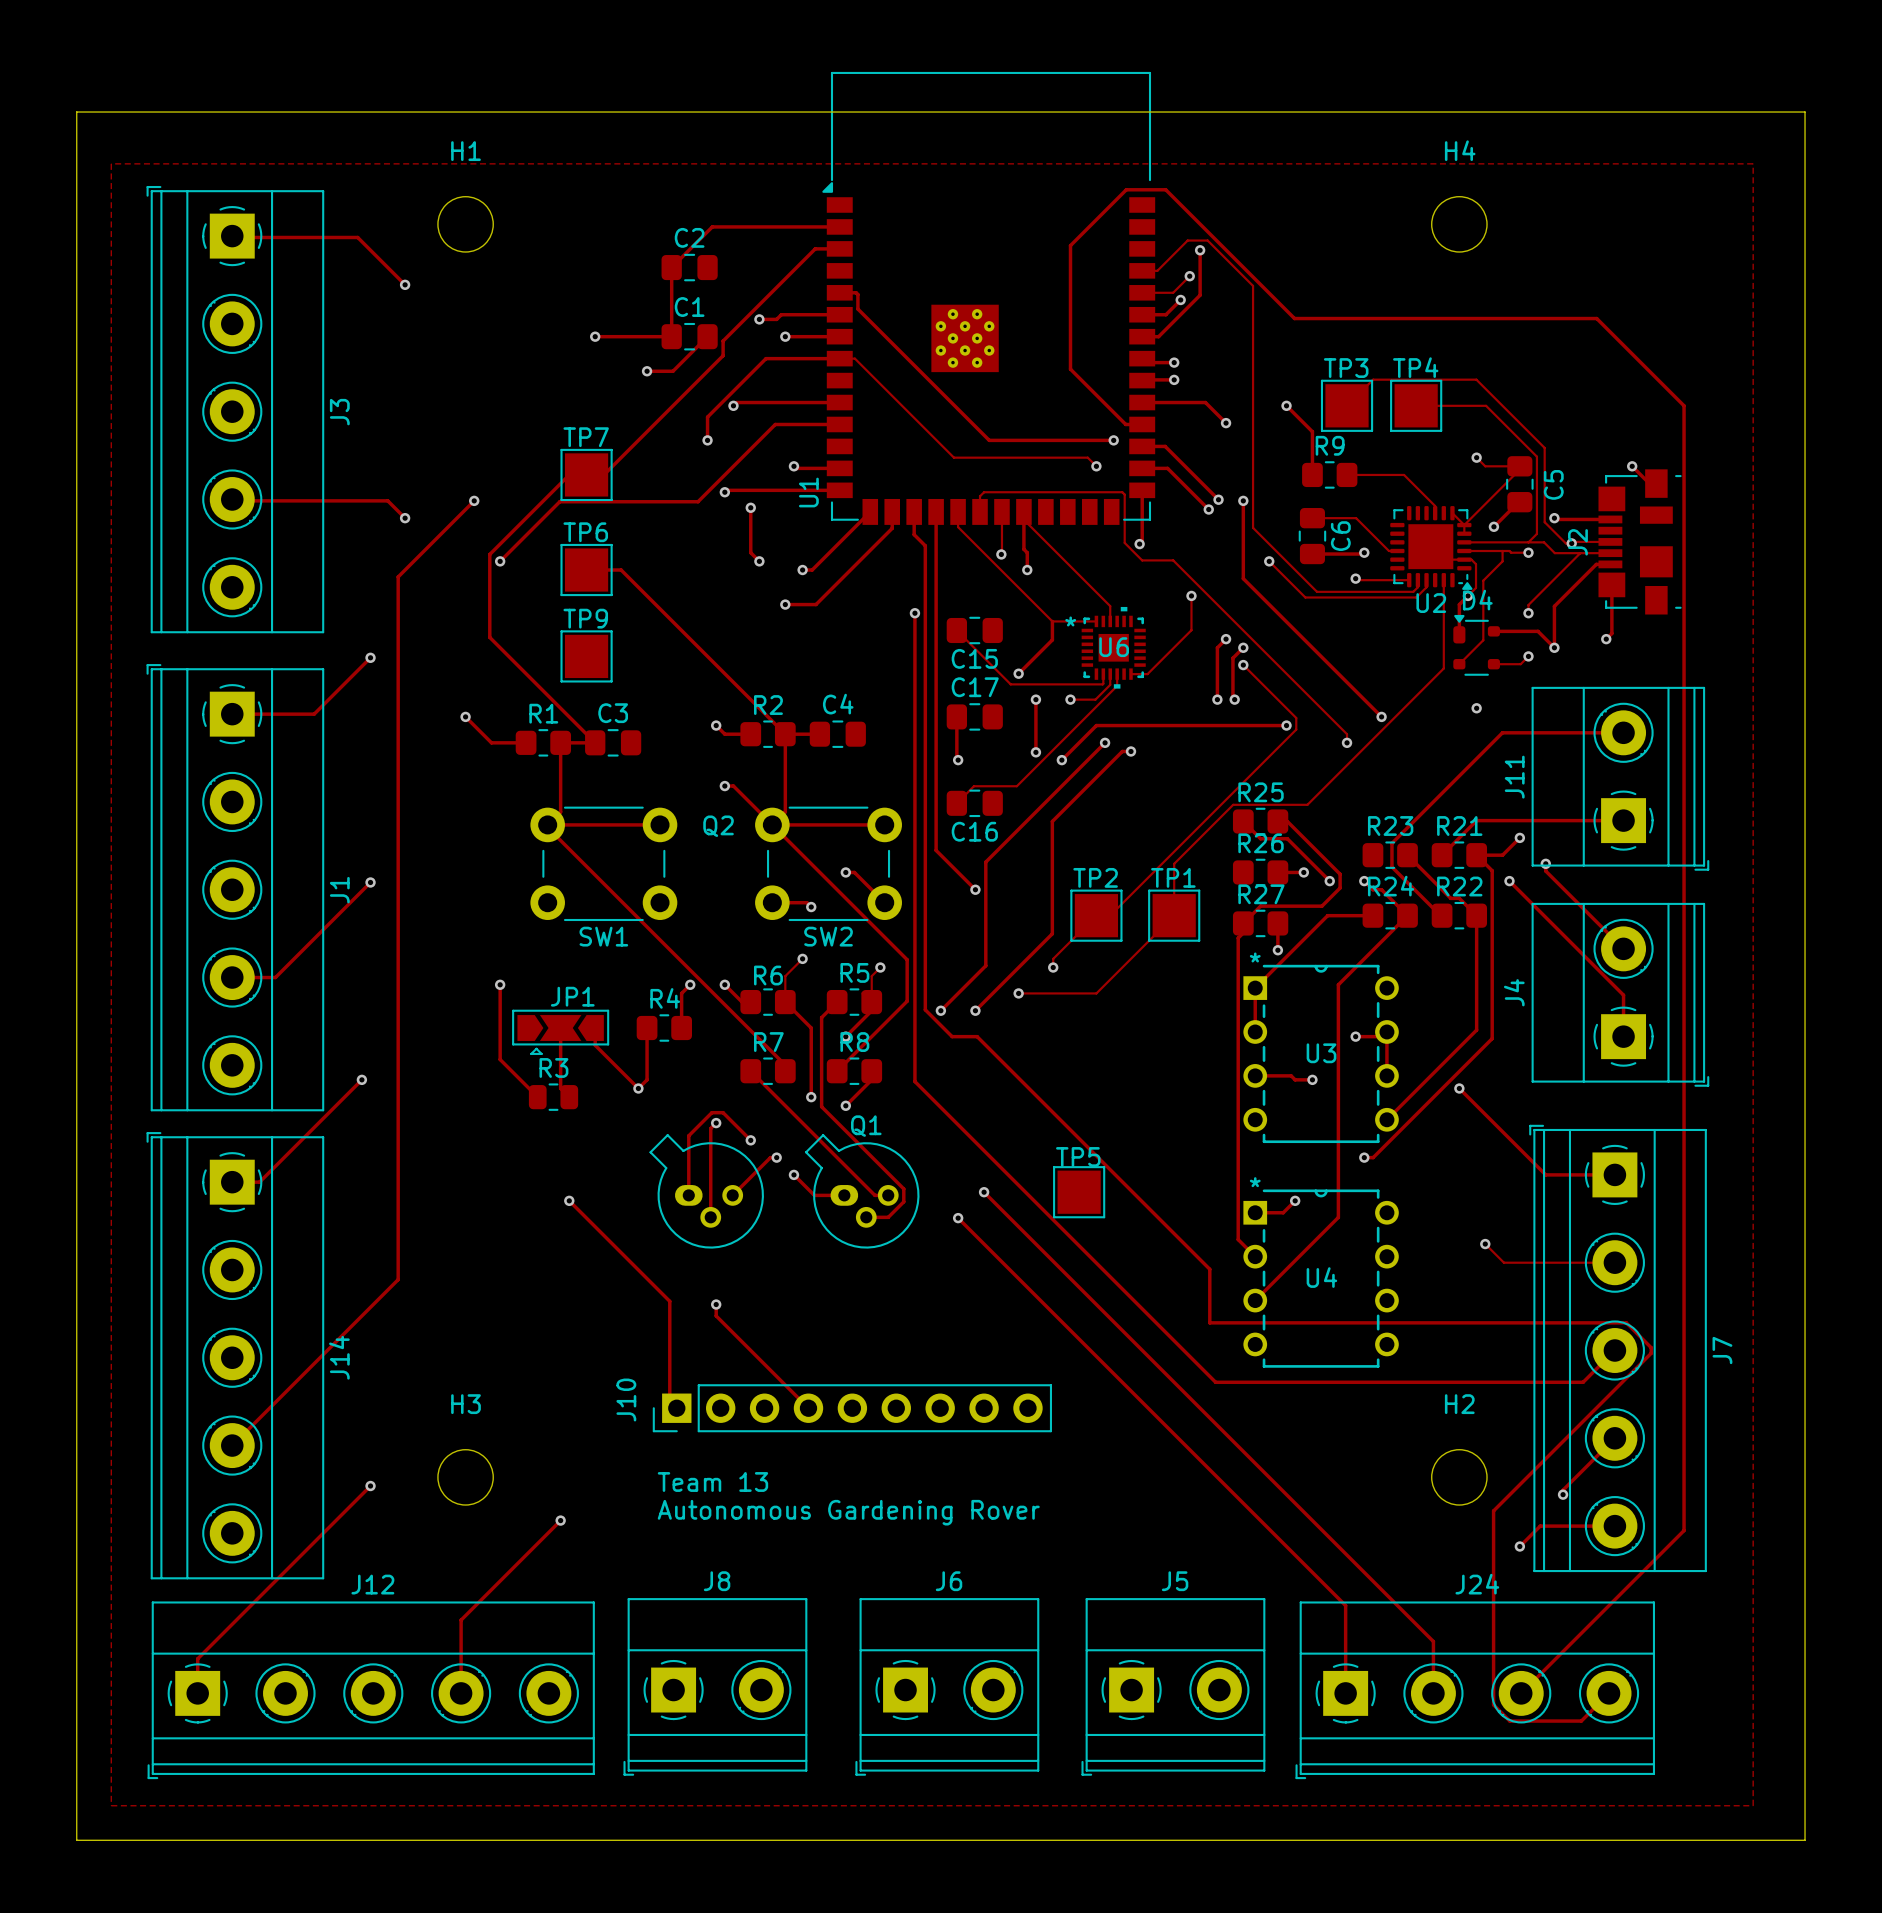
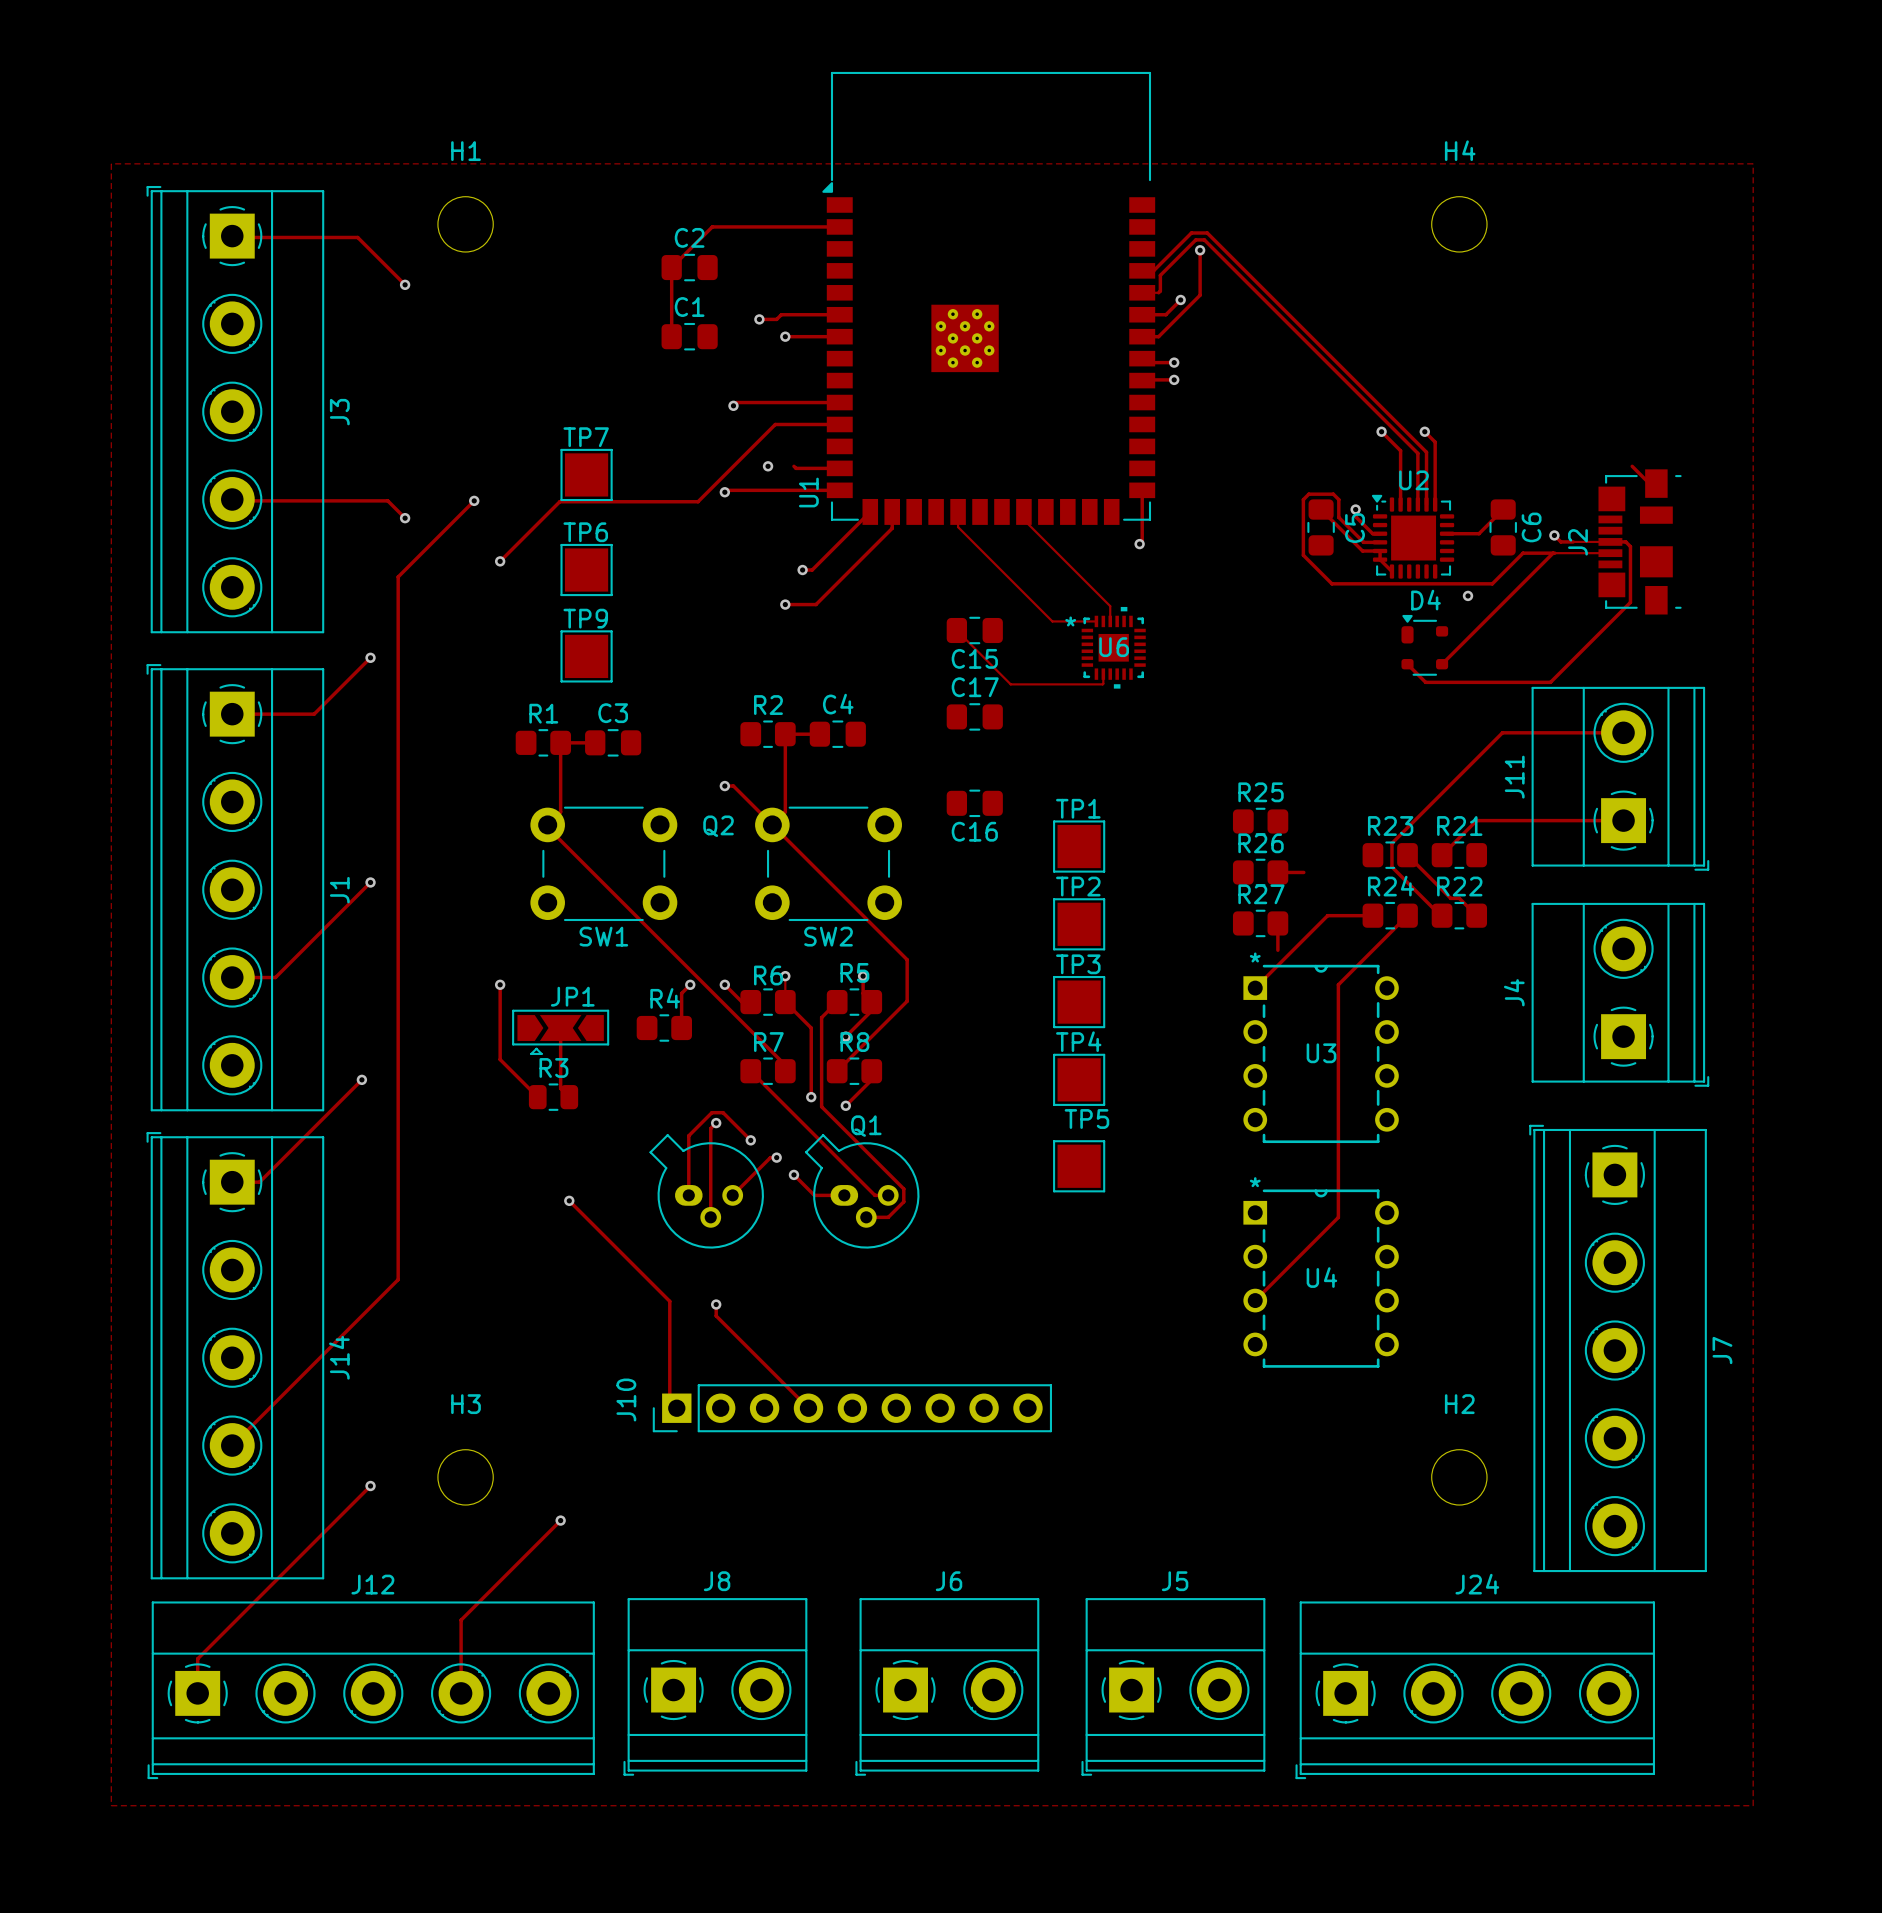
board edge: (76, 112) (1805, 112) (1805, 1840) (76, 1840) (76, 112) -> none
track: (839, 248) (815, 248) (723, 341) (723, 355) (603, 474) (569, 474) (489, 554) (489, 637) (595, 742) -> none
track: (1142, 270) (1157, 270) (1187, 240) (1207, 240) (1253, 285) (1253, 527) (1317, 591) (1413, 591) (1417, 587) (1417, 580) -> none
track: none -> (1153, 270) (1191, 232) (1207, 232) (1426, 452) (1426, 504)
track: (1189, 276) (1173, 292) (1158, 292) -> (1417, 504) (1417, 453) (1204, 239) (1195, 239) (1160, 275) (1160, 291) (1158, 292)
via: (1189, 276) -> none
track: (839, 292) (856, 292) (857, 294) (857, 309) (989, 440) (1113, 440) -> none
track: (595, 336) (671, 336) -> none
via: (595, 336) -> none
track: (707, 336) (672, 371) (647, 371) -> none
via: (647, 371) -> none
track: (1142, 402) (1205, 402) (1226, 423) -> none
track: (1286, 405) (1312, 431) (1312, 474) -> none
via: (1286, 405) -> none
track: (1347, 405) (1373, 379) (1476, 379) (1544, 447) (1544, 522) (1565, 543) (1573, 541) -> (1554, 535) (1560, 541) (1573, 541)
TP3 position: (1347, 405) -> (1079, 1002)
track: (1416, 405) (1486, 405) (1536, 456) (1536, 533) (1528, 542) -> none
TP4 position: (1416, 405) -> (1079, 1079)
via: (1226, 423) -> none
track: (1142, 424) (1125, 424) (1070, 369) (1070, 245) (1126, 189) (1165, 189) (1294, 318) (1596, 318) (1684, 405) (1684, 1530) (1521, 1693) -> none
track: none -> (1381, 431) (1400, 450) (1400, 504)
via: none -> (1381, 431)
track: none -> (1424, 431) (1435, 442) (1435, 504)
via: none -> (1424, 431)
track: (707, 440) (707, 417) (765, 358) (854, 358) (953, 457) (1087, 457) (1096, 466) -> none
via: (707, 440) -> none
via: (1113, 440) -> none
track: (1142, 446) (1165, 446) (1218, 499) -> none
track: (1476, 457) (1485, 466) (1519, 466) (1519, 469) (1464, 525) -> none
via: (1476, 457) -> none
via: none -> (768, 466)
via: (793, 466) -> none
via: (1096, 466) -> none
via: (1632, 466) -> none
track: (1142, 468) (1167, 468) (1208, 509) -> none
R9: (1329, 474) -> none
track: (1347, 474) (1404, 474) (1435, 506) (1435, 513) -> none
C5 position: (1519, 484) -> (1321, 527)
via: (1218, 499) -> none
track: (1243, 500) (1243, 578) (1381, 716) -> none
via: (1243, 500) -> none
track: (1519, 502) (1493, 526) -> none
track: (750, 507) (750, 552) (759, 561) -> none
via: (750, 507) -> none
via: (1208, 509) -> none
track: none -> (1321, 509) (1362, 551) (1380, 551) (1380, 559) (1391, 571)
track: none -> (1355, 509) (1355, 516) (1372, 533) (1380, 533)
via: none -> (1355, 509)
track: none -> (1503, 509) (1479, 533) (1447, 533)
track: (914, 511) (914, 534) (925, 545) (925, 1009) (952, 1036) (977, 1036) (1209, 1269) (1209, 1322) (1626, 1322) (1651, 1347) (1651, 1353) (1493, 1510) (1493, 1704) (1509, 1721) (1581, 1721) (1609, 1693) -> none
track: (936, 511) (936, 850) (975, 889) -> none
track: (980, 511) (980, 496) (984, 492) (1122, 492) (1124, 494) (1124, 542) (1142, 560) (1173, 560) (1347, 734) (1347, 742) -> none
track: (1001, 511) (1001, 554) -> none
track: (1023, 511) (1023, 549) (1027, 552) (1027, 570) -> none
track: (1452, 513) (1464, 525) -> none
track: (1312, 518) (1356, 518) (1388, 551) (1397, 551) -> none
track: (1554, 518) (1610, 519) -> none
via: (1554, 518) -> none
track: (1464, 525) (1464, 533) -> none
via: (1493, 526) -> none
via: none -> (1554, 535)
C6 position: (1312, 536) -> (1503, 527)
track: none -> (1610, 541) (1625, 541) (1630, 546) (1630, 602) (1550, 682) (1425, 682) (1407, 664)
track: (1464, 542) (1544, 542) (1554, 553) -> (1380, 542) (1363, 542) (1338, 517) (1338, 499) (1333, 494) (1308, 494) (1303, 499) (1303, 555) (1331, 583) (1492, 583) (1523, 553) (1554, 553)
via: (1571, 543) -> none
track: (1430, 546) (1443, 559) (1471, 559) (1476, 564) (1476, 587) (1459, 604) (1459, 634) -> none
U2 rotation: 0° (1431, 547) -> 180° (1413, 536)
track: (1464, 551) (1528, 552) -> none
track: (1502, 551) (1502, 561) (1483, 580) (1483, 640) (1459, 664) -> none
track: (1364, 552) (1312, 554) -> none
via: (1364, 552) -> none
via: (1528, 552) -> none
track: none -> (1553, 553) (1442, 664)
track: (1580, 553) (1528, 605) (1528, 613) -> none
via: (1001, 554) -> none
via: (759, 561) -> none
track: (1269, 561) (1305, 597) (1416, 597) (1426, 587) (1426, 580) -> none
via: (1269, 561) -> none
track: (1610, 564) (1596, 564) (1554, 606) (1554, 647) (1538, 631) (1493, 631) -> none
track: (586, 570) (621, 570) (785, 734) -> none
via: (1027, 570) -> none
track: (1355, 578) (1409, 580) -> none
via: (1355, 578) -> none
track: (1443, 580) (1443, 668) (1307, 804) (1233, 804) (1174, 863) (1174, 915) (1096, 993) (1018, 993) -> none
track: (1611, 584) (1611, 633) (1606, 639) -> none
track: (1191, 595) (1191, 630) (1147, 674) (1130, 674) -> none
via: (1191, 595) -> none
track: (914, 613) (914, 1081) (1215, 1382) (1583, 1382) (1614, 1350) -> none
via: (914, 613) -> none
via: (1528, 613) -> none
track: (1052, 621) (1052, 639) (1018, 673) -> none
track: (1226, 639) (1217, 647) (1217, 699) -> none
via: (1226, 639) -> none
via: (1606, 639) -> none
D4 position: (1476, 645) -> (1424, 645)
track: (1243, 647) (1232, 658) (1232, 697) (1234, 699) -> none
via: (1243, 647) -> none
via: (1554, 647) -> none
track: (1528, 656) (1520, 664) (1493, 664) -> none
via: (1528, 656) -> none
track: (1243, 665) (1296, 718) (1296, 729) (1110, 915) (1096, 915) (1053, 958) (1053, 967) -> none
via: (1243, 665) -> none
via: (1018, 673) -> none
track: (1110, 674) (1110, 684) (1095, 699) (1070, 699) -> none
track: (1117, 674) (1117, 685) (1016, 786) (973, 786) (956, 803) -> none
track: (1035, 699) (1035, 752) -> none
via: (1035, 699) -> none
via: (1070, 699) -> none
via: (1217, 699) -> none
via: (1234, 699) -> none
via: (1476, 708) -> none
track: (465, 716) (491, 742) (526, 742) -> none
via: (465, 716) -> none
track: (956, 716) (958, 760) -> none
via: (1381, 716) -> none
track: (716, 725) (724, 734) (750, 734) -> none
via: (716, 725) -> none
track: (1286, 725) (1096, 725) (1061, 760) -> none
via: (1286, 725) -> none
track: (1105, 742) (985, 862) (985, 965) (940, 1010) -> none
via: (1105, 742) -> none
via: (1347, 742) -> none
track: (1130, 751) (1122, 751) (1052, 821) (1052, 933) (975, 1010) -> none
via: (1130, 751) -> none
via: (1035, 752) -> none
via: (958, 760) -> none
via: (1061, 760) -> none
track: (1243, 821) (1260, 838) (1287, 838) (1329, 881) -> none
track: (1277, 821) (1287, 821) (1340, 874) (1340, 888) (1321, 906) (1260, 906) (1243, 923) (1243, 932) (1238, 938) (1238, 1239) (1255, 1256) -> none
track: (547, 824) (660, 824) -> none
track: (772, 824) (884, 824) -> none
track: (1519, 837) (1502, 855) (1476, 855) (1492, 870) (1492, 1038) (1373, 1157) (1364, 1157) -> none
via: (1519, 837) -> none
track: (1545, 863) (1545, 871) (1623, 948) -> none
via: (1545, 863) -> none
track: (845, 872) (854, 872) (884, 902) -> none
via: (845, 872) -> none
via: (1303, 872) -> none
via: (1329, 881) -> none
track: (1364, 881) (1372, 889) (1381, 889) (1407, 915) -> none
via: (1364, 881) -> none
track: (1509, 881) (1623, 995) (1623, 1036) -> none
via: (1509, 881) -> none
via: (975, 889) -> none
track: (772, 902) (806, 902) (811, 907) -> none
via: (811, 907) -> none
TP2 position: (1096, 915) -> (1079, 924)
TP1 position: (1174, 915) -> (1079, 846)
track: (1476, 915) (1476, 1030) (1386, 1119) -> none
via: (1277, 950) -> none
track: (802, 958) (785, 976) -> none
via position: (802, 958) -> (785, 976)
track: (880, 967) (871, 976) (871, 1002) -> none
via position: (880, 967) -> (863, 976)
via: (1053, 967) -> none
track: none -> (863, 976) (863, 993)
track: (1255, 988) (1255, 1031) -> none
via: (1018, 993) -> none
via: (940, 1010) -> none
via: (975, 1010) -> none
track: (595, 1028) (595, 1045) (638, 1088) (647, 1079) (647, 1028) -> none
track: (1355, 1036) (1382, 1036) (1386, 1031) (1386, 1075) -> none
via: (1355, 1036) -> none
track: (1255, 1075) (1291, 1075) (1295, 1079) (1312, 1079) -> none
via: (1312, 1079) -> none
via: (638, 1088) -> none
track: (1459, 1088) (1545, 1174) (1614, 1174) -> none
via: (1459, 1088) -> none
TP5 name position: TP5 (1078, 1156) -> TP5 (1086, 1119)
via: (1364, 1157) -> none
track: (984, 1192) (1433, 1641) (1433, 1693) -> none
via: (984, 1192) -> none
TP5 position: (1079, 1192) -> (1079, 1166)
track: (1295, 1200) (1283, 1212) (1255, 1212) -> none
via: (1295, 1200) -> none
track: (958, 1218) (1345, 1605) (1345, 1693) -> none
via: (958, 1218) -> none
track: (1485, 1244) (1503, 1262) (1614, 1262) -> none
via: (1485, 1244) -> none
track: (1614, 1438) (1563, 1490) (1563, 1494) -> none
text: Team 13 (712, 1481) -> none
via: (1563, 1494) -> none
text: Autonomous Gardening Rover (848, 1512) -> none
track: (1614, 1526) (1540, 1526) (1519, 1546) -> none
via: (1519, 1546) -> none

